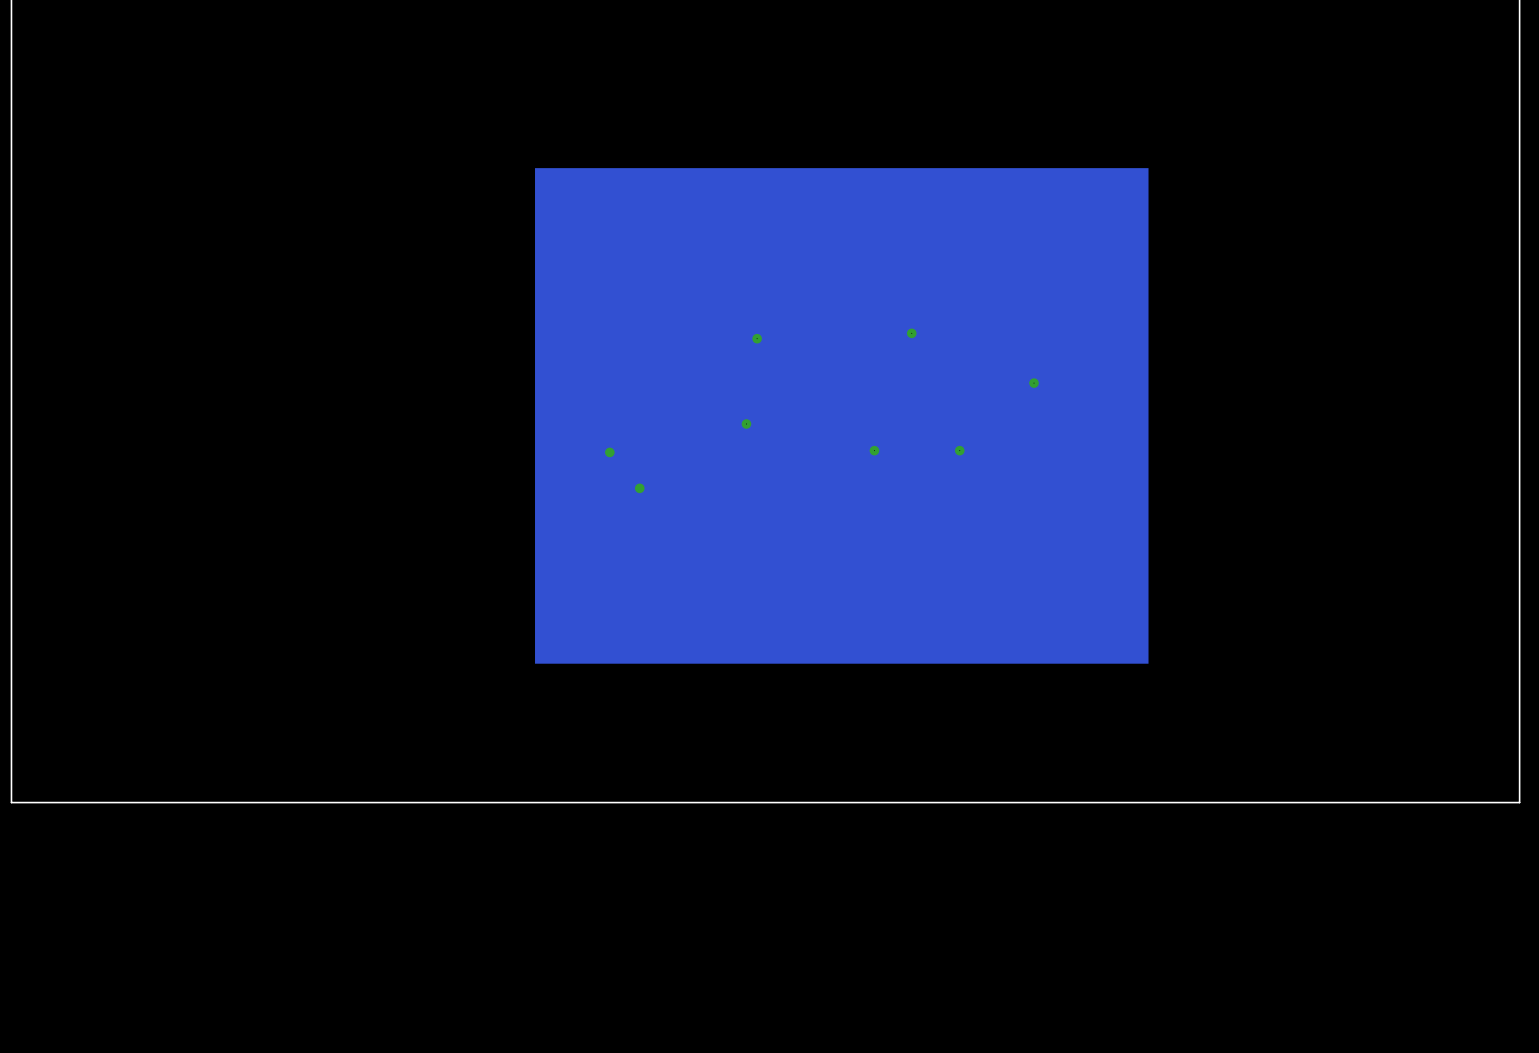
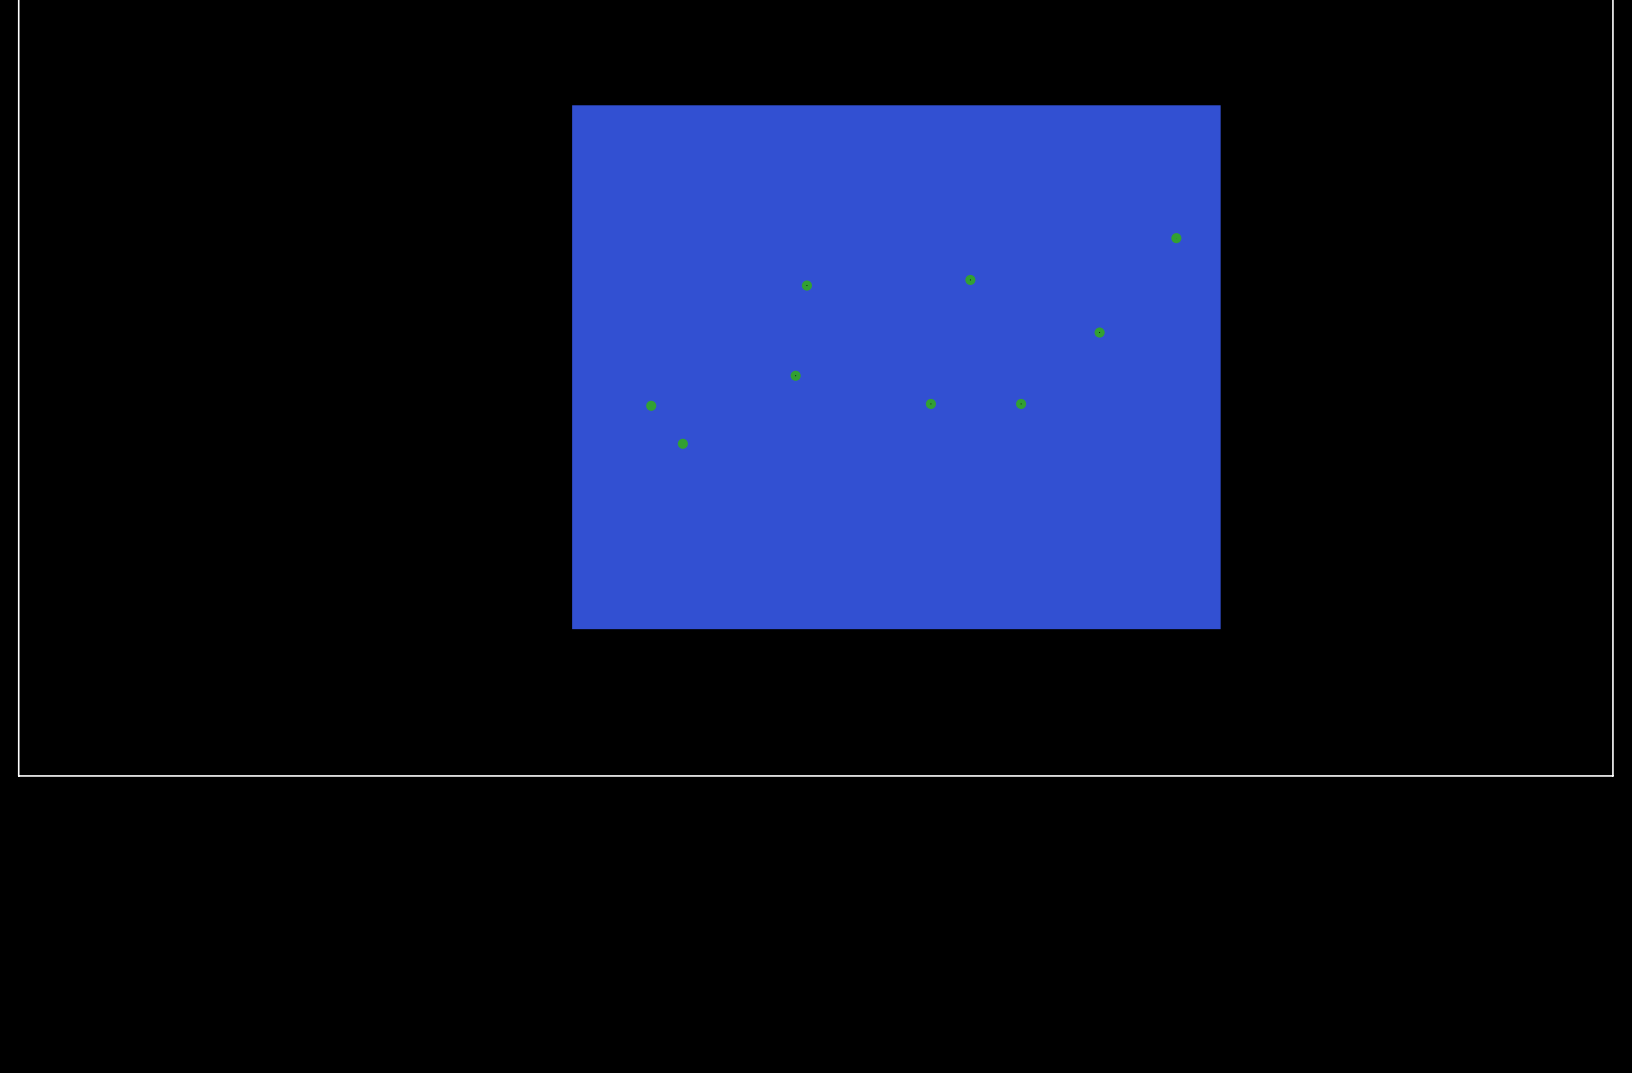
via: none -> (1176, 238)

